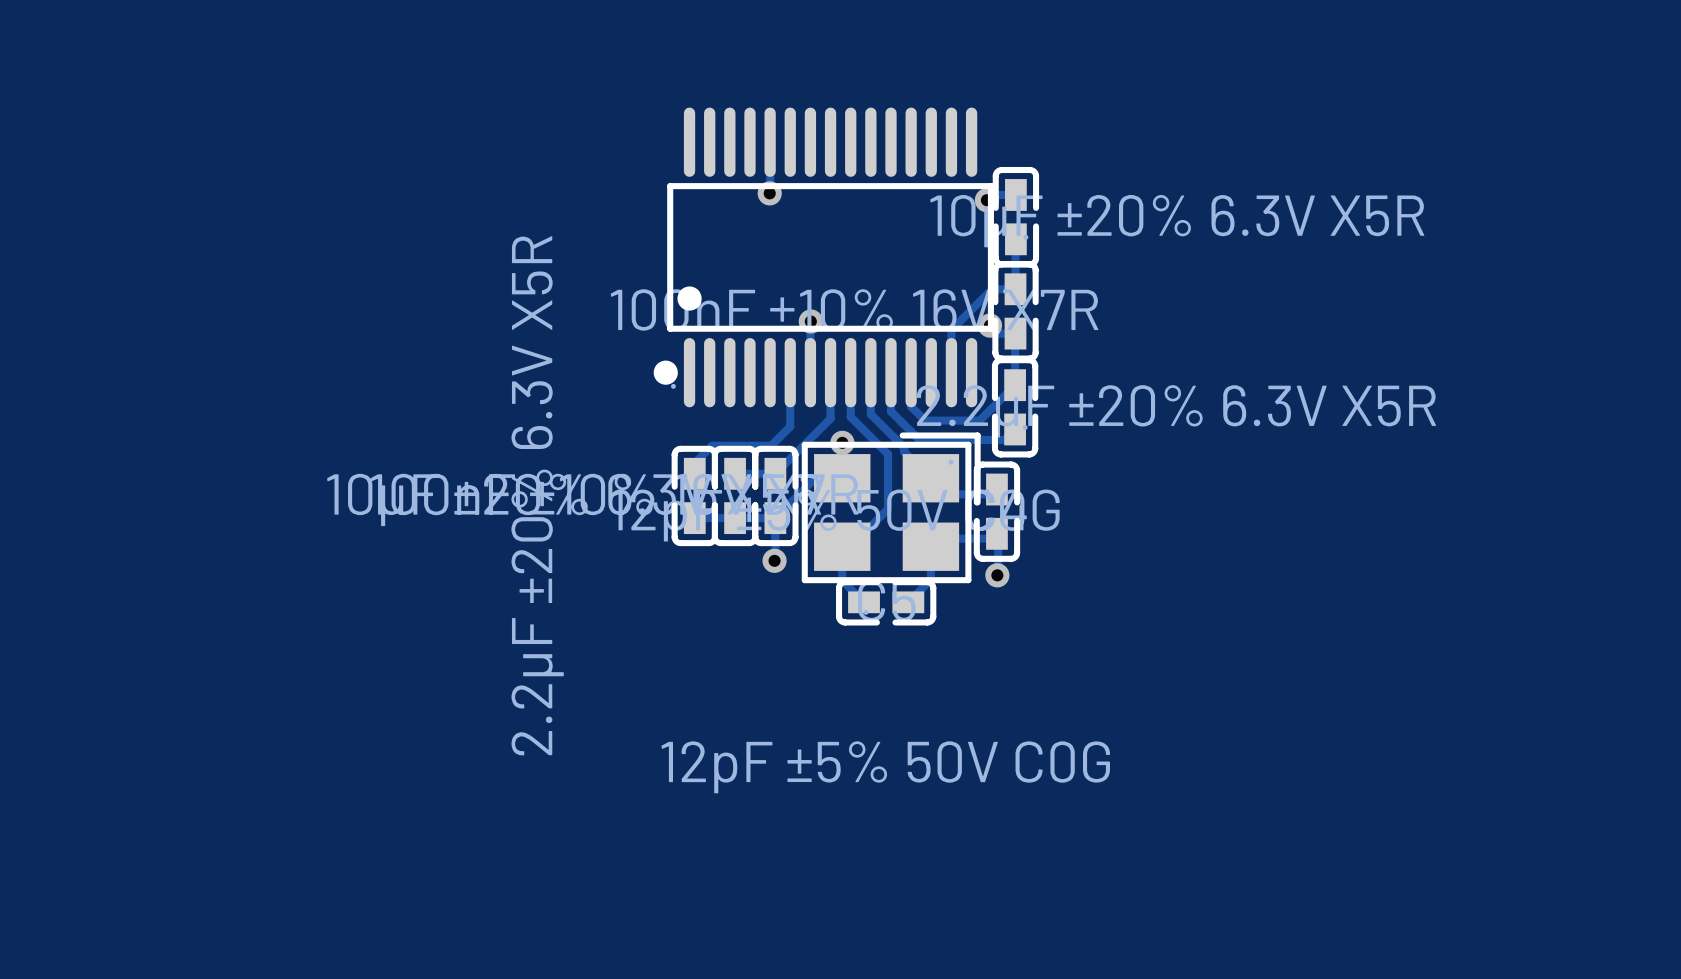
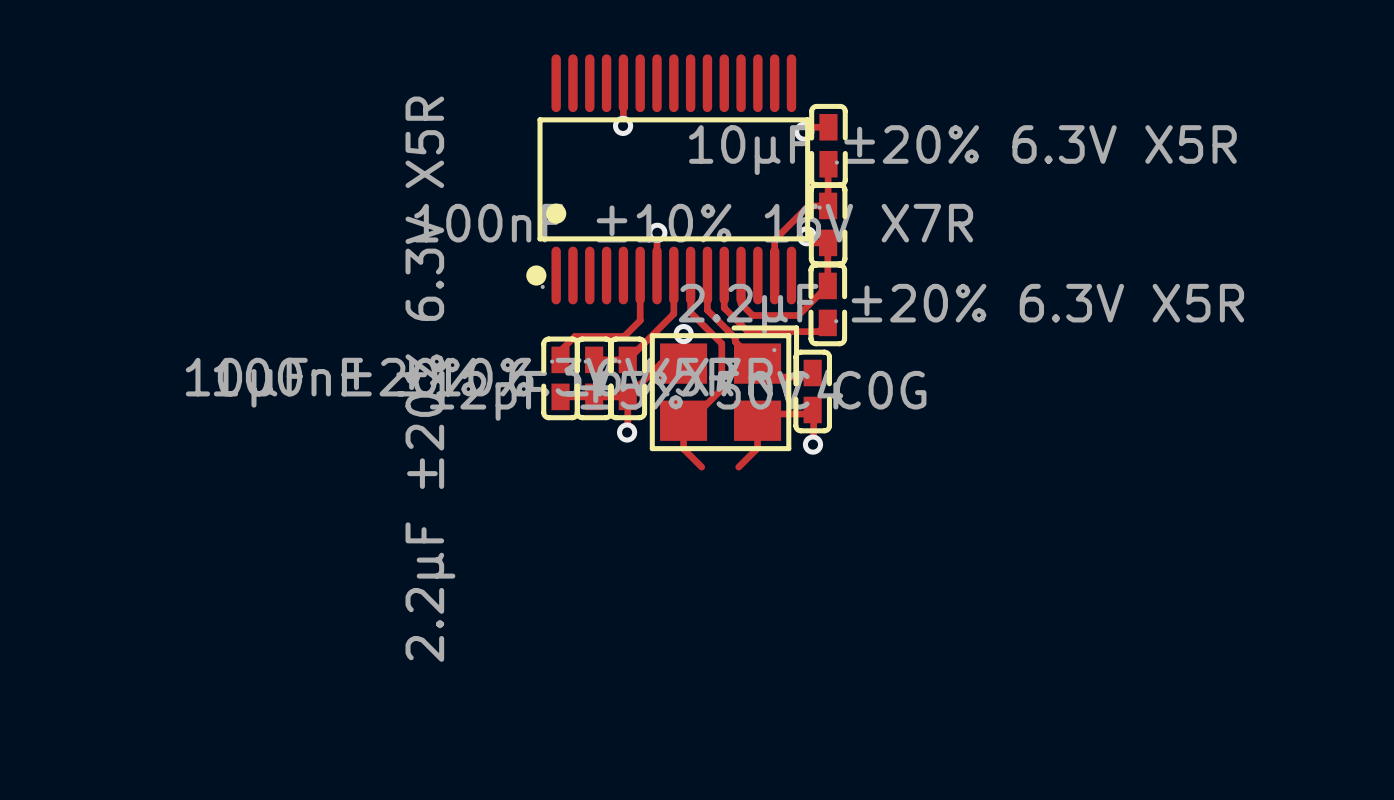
part: 12pF ±5% 50V C0G (886, 602) -> none

